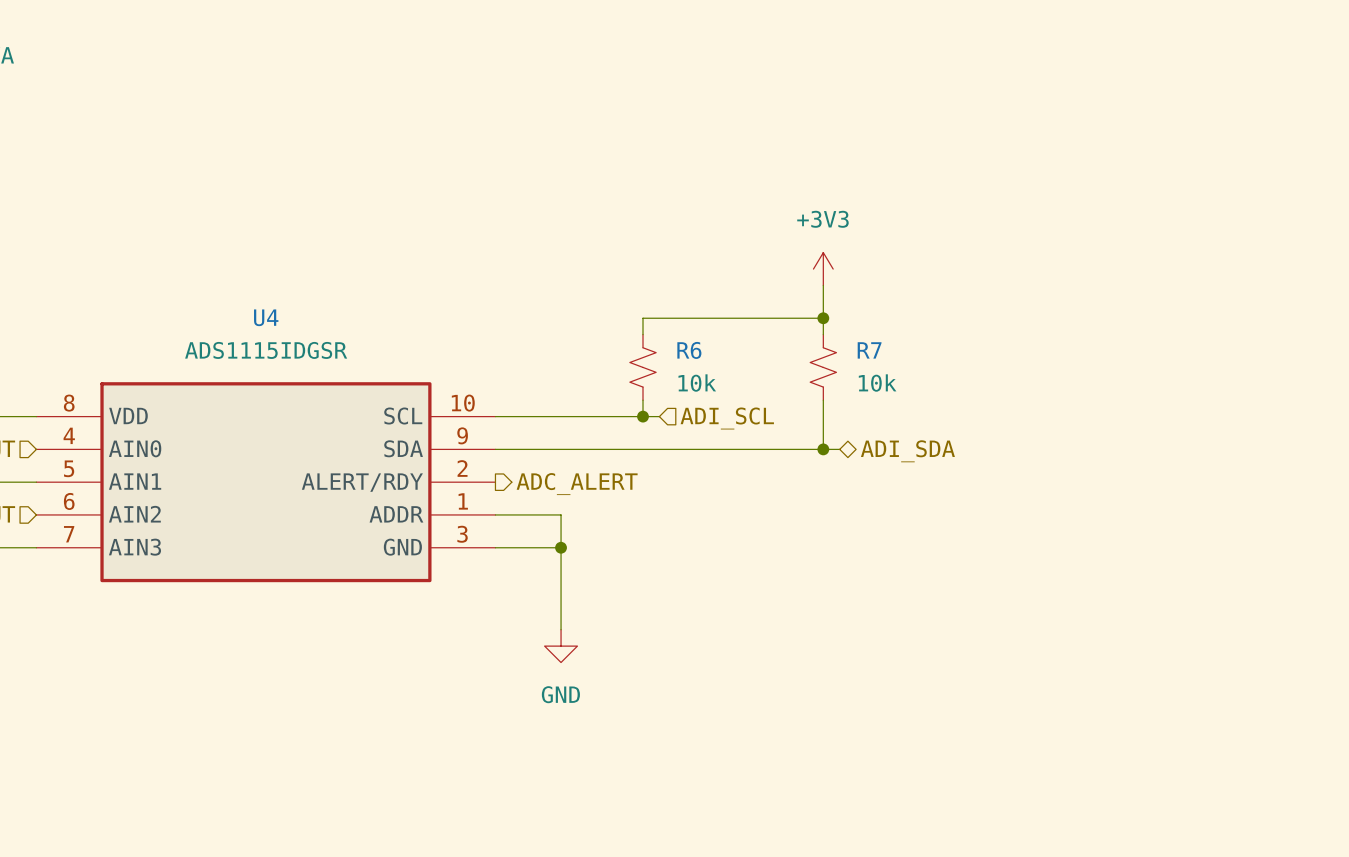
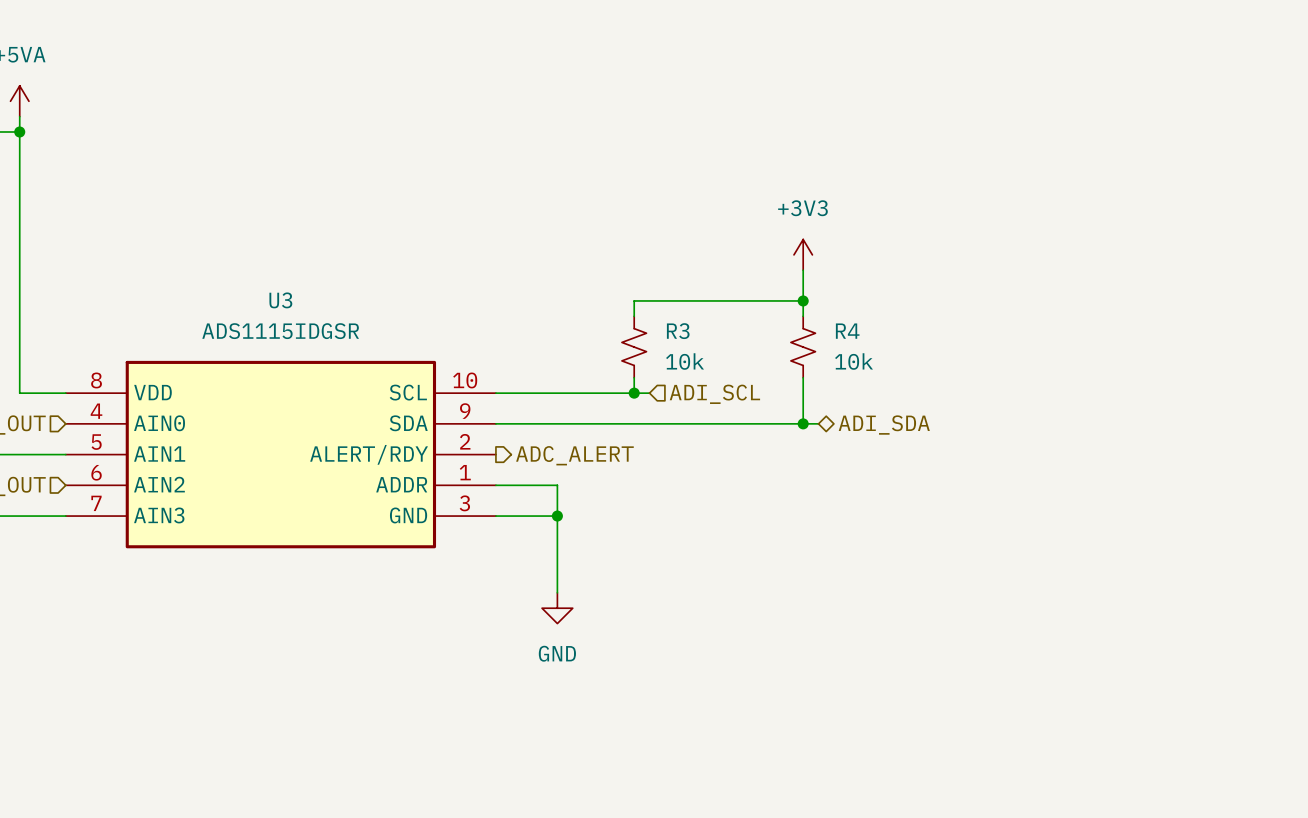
U4 name: U4 (266, 317) -> U3 (280, 300)
R6 name: R6 (689, 350) -> R3 (678, 331)
R7 name: R7 (869, 350) -> R4 (847, 331)

